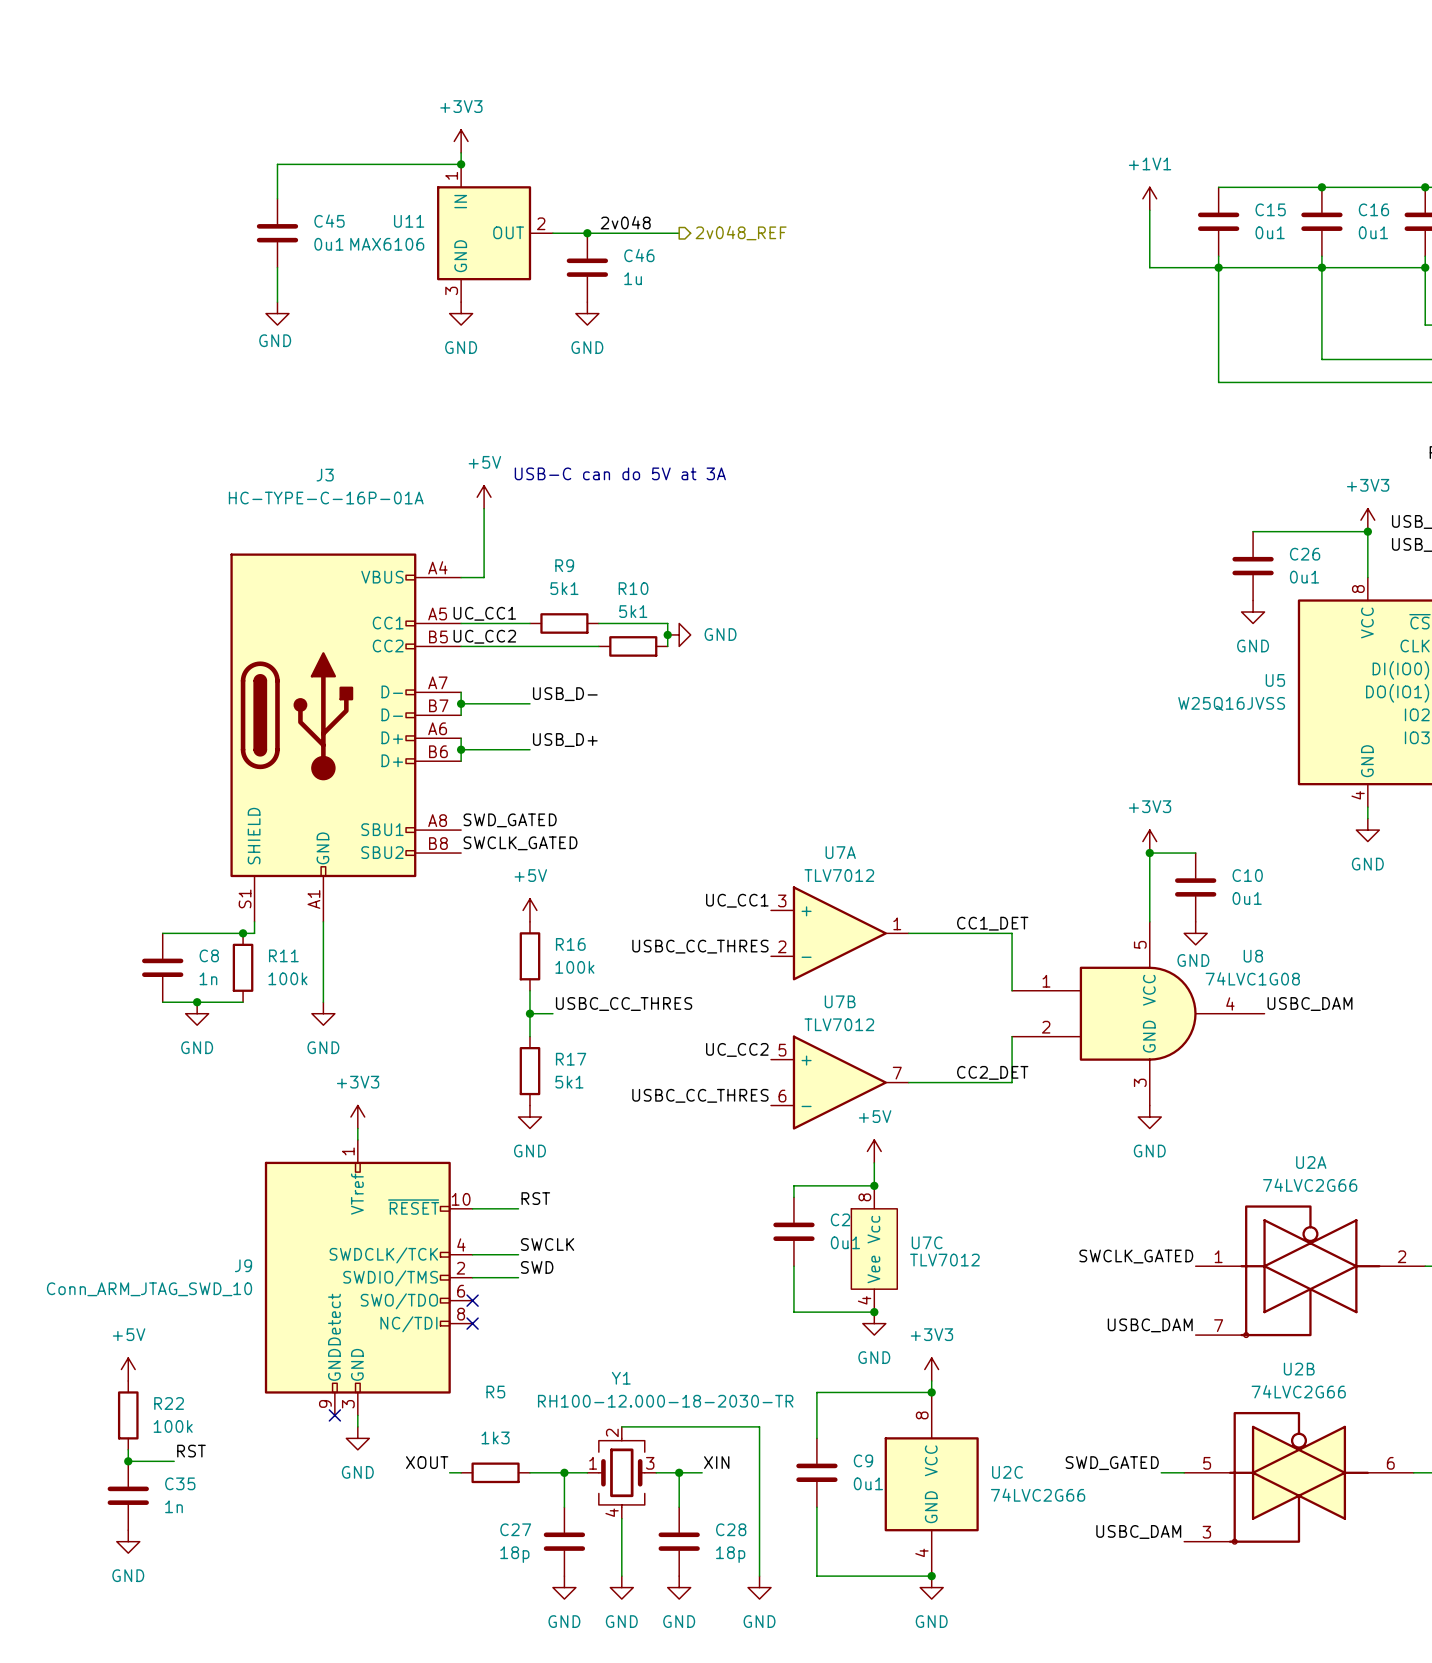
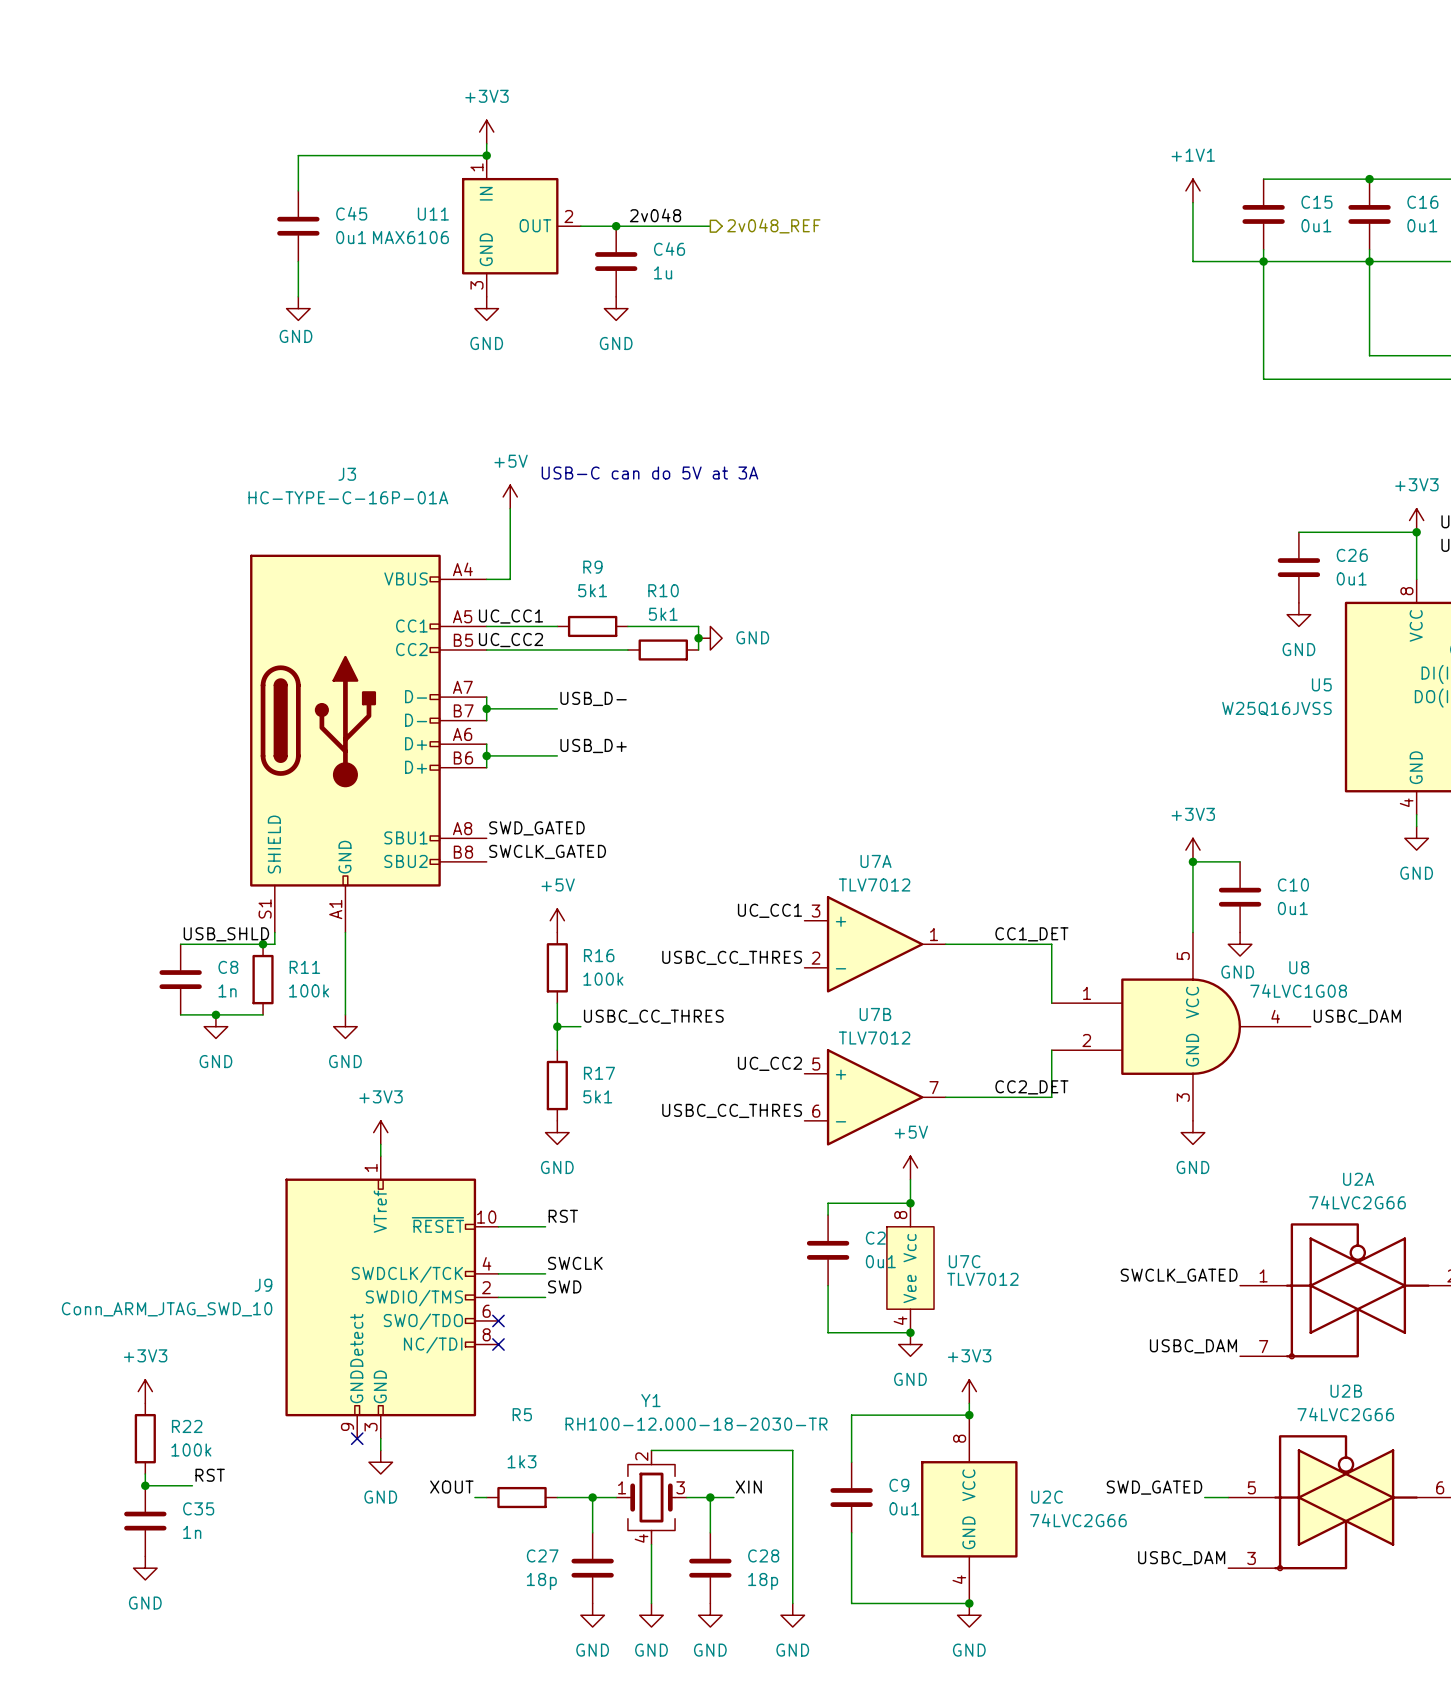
label: none -> USB_SHLD (226, 934)
power symbol: +5V (128, 1369) -> +3V3 (145, 1391)

